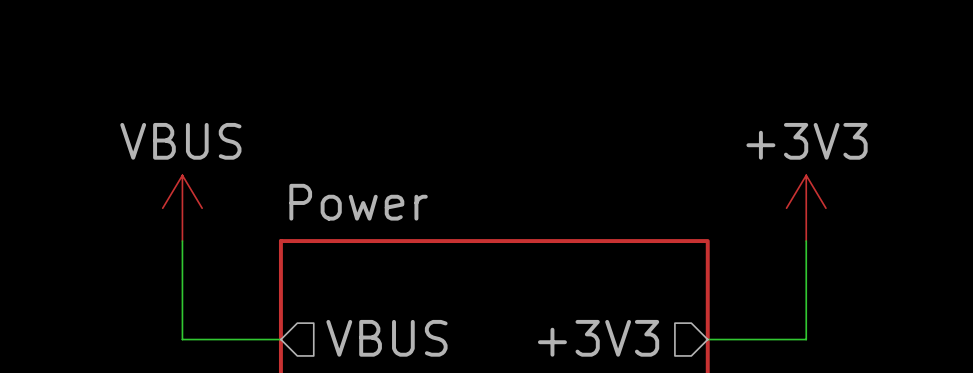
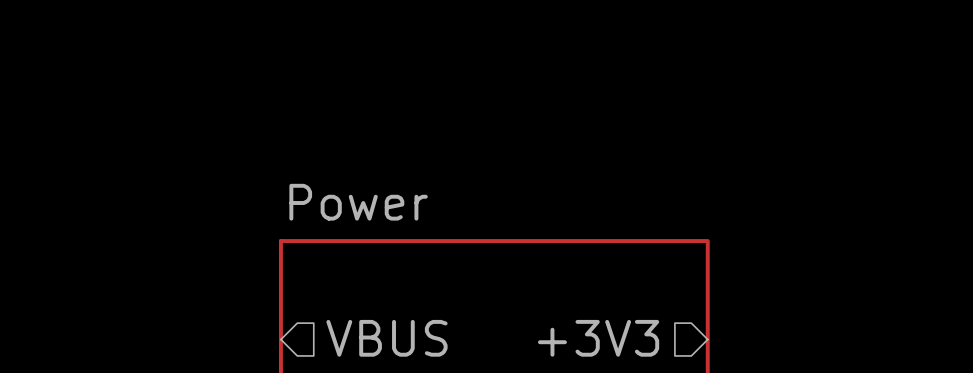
power symbol: VBUS (182, 208) -> none
power symbol: +3V3 (806, 208) -> none
wire: (182, 241) (182, 339) (280, 339) -> none
wire: (806, 241) (806, 339) (707, 339) -> none

